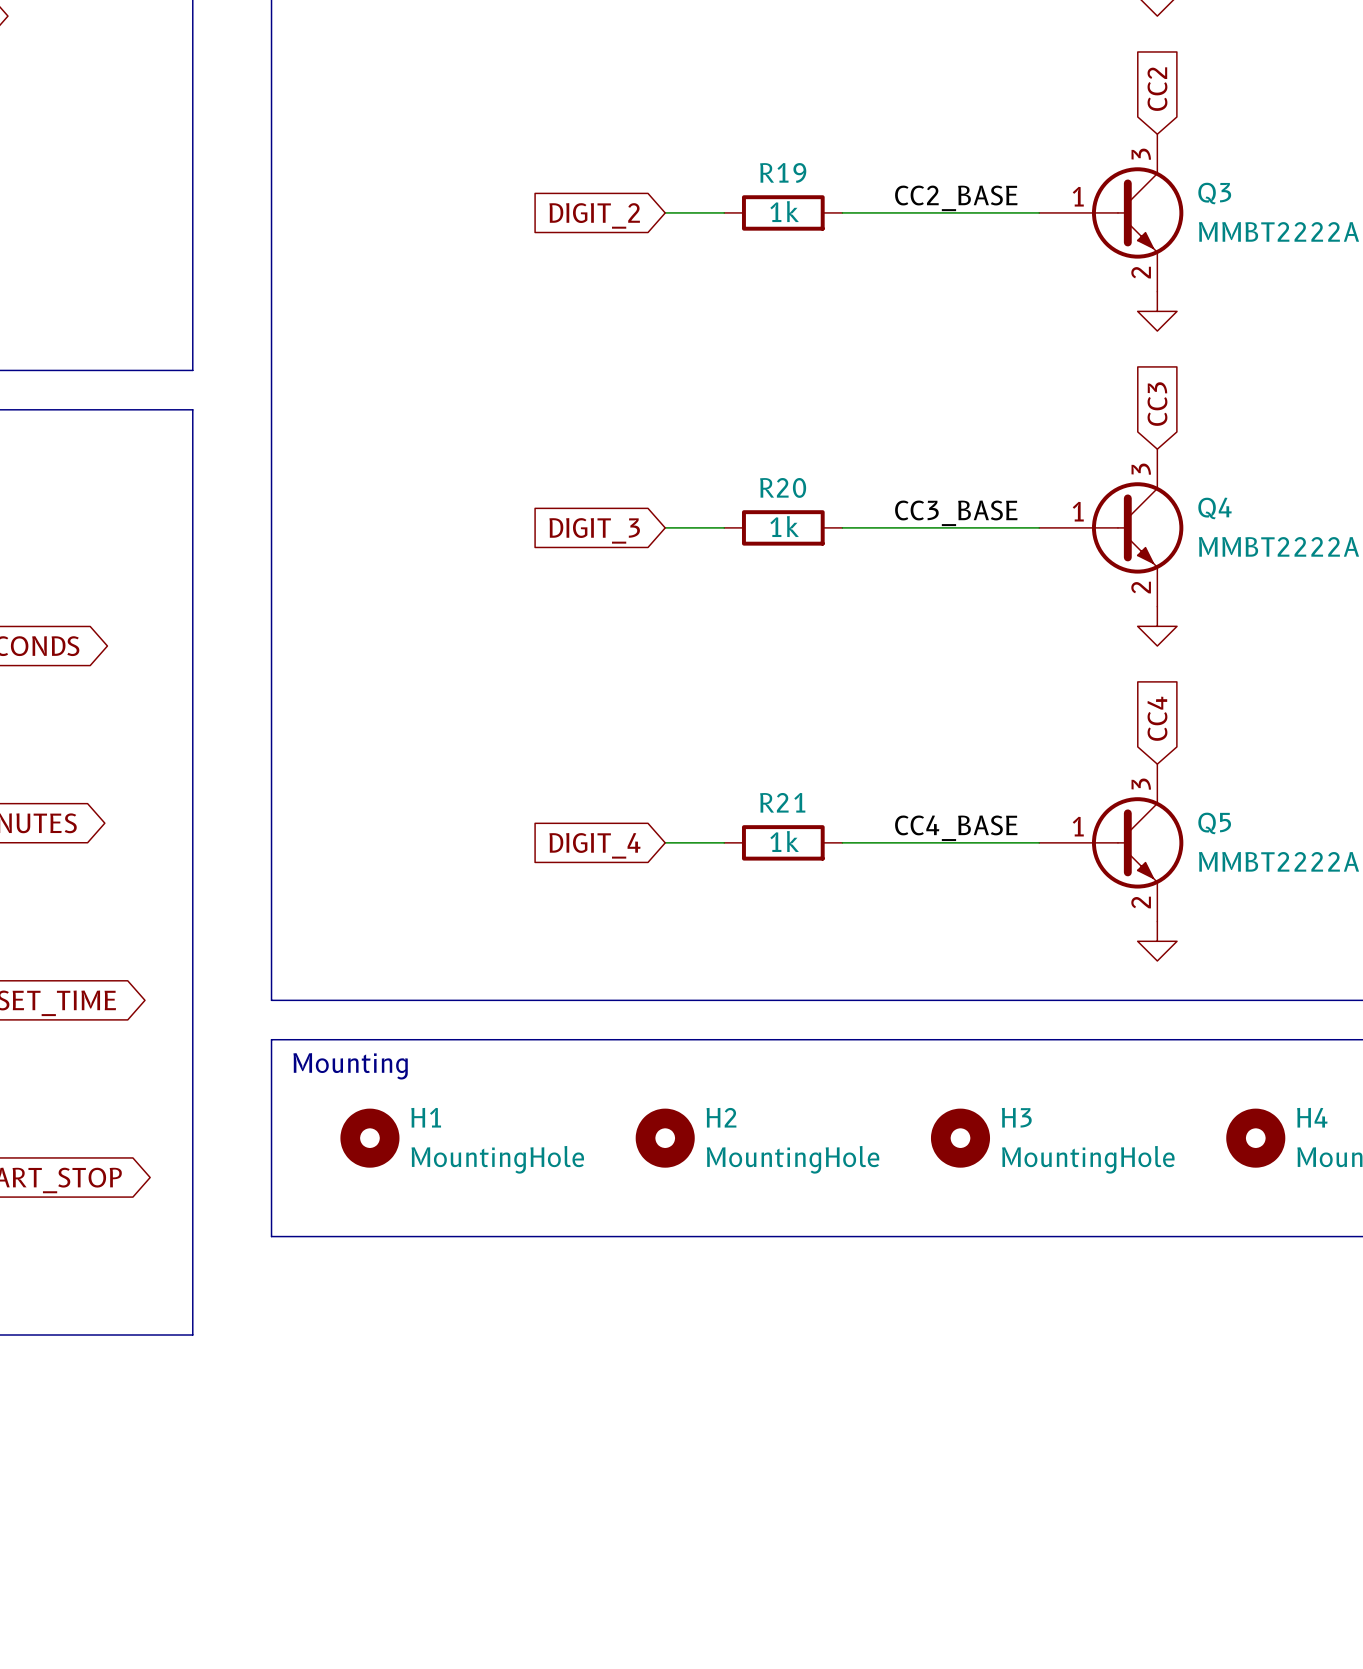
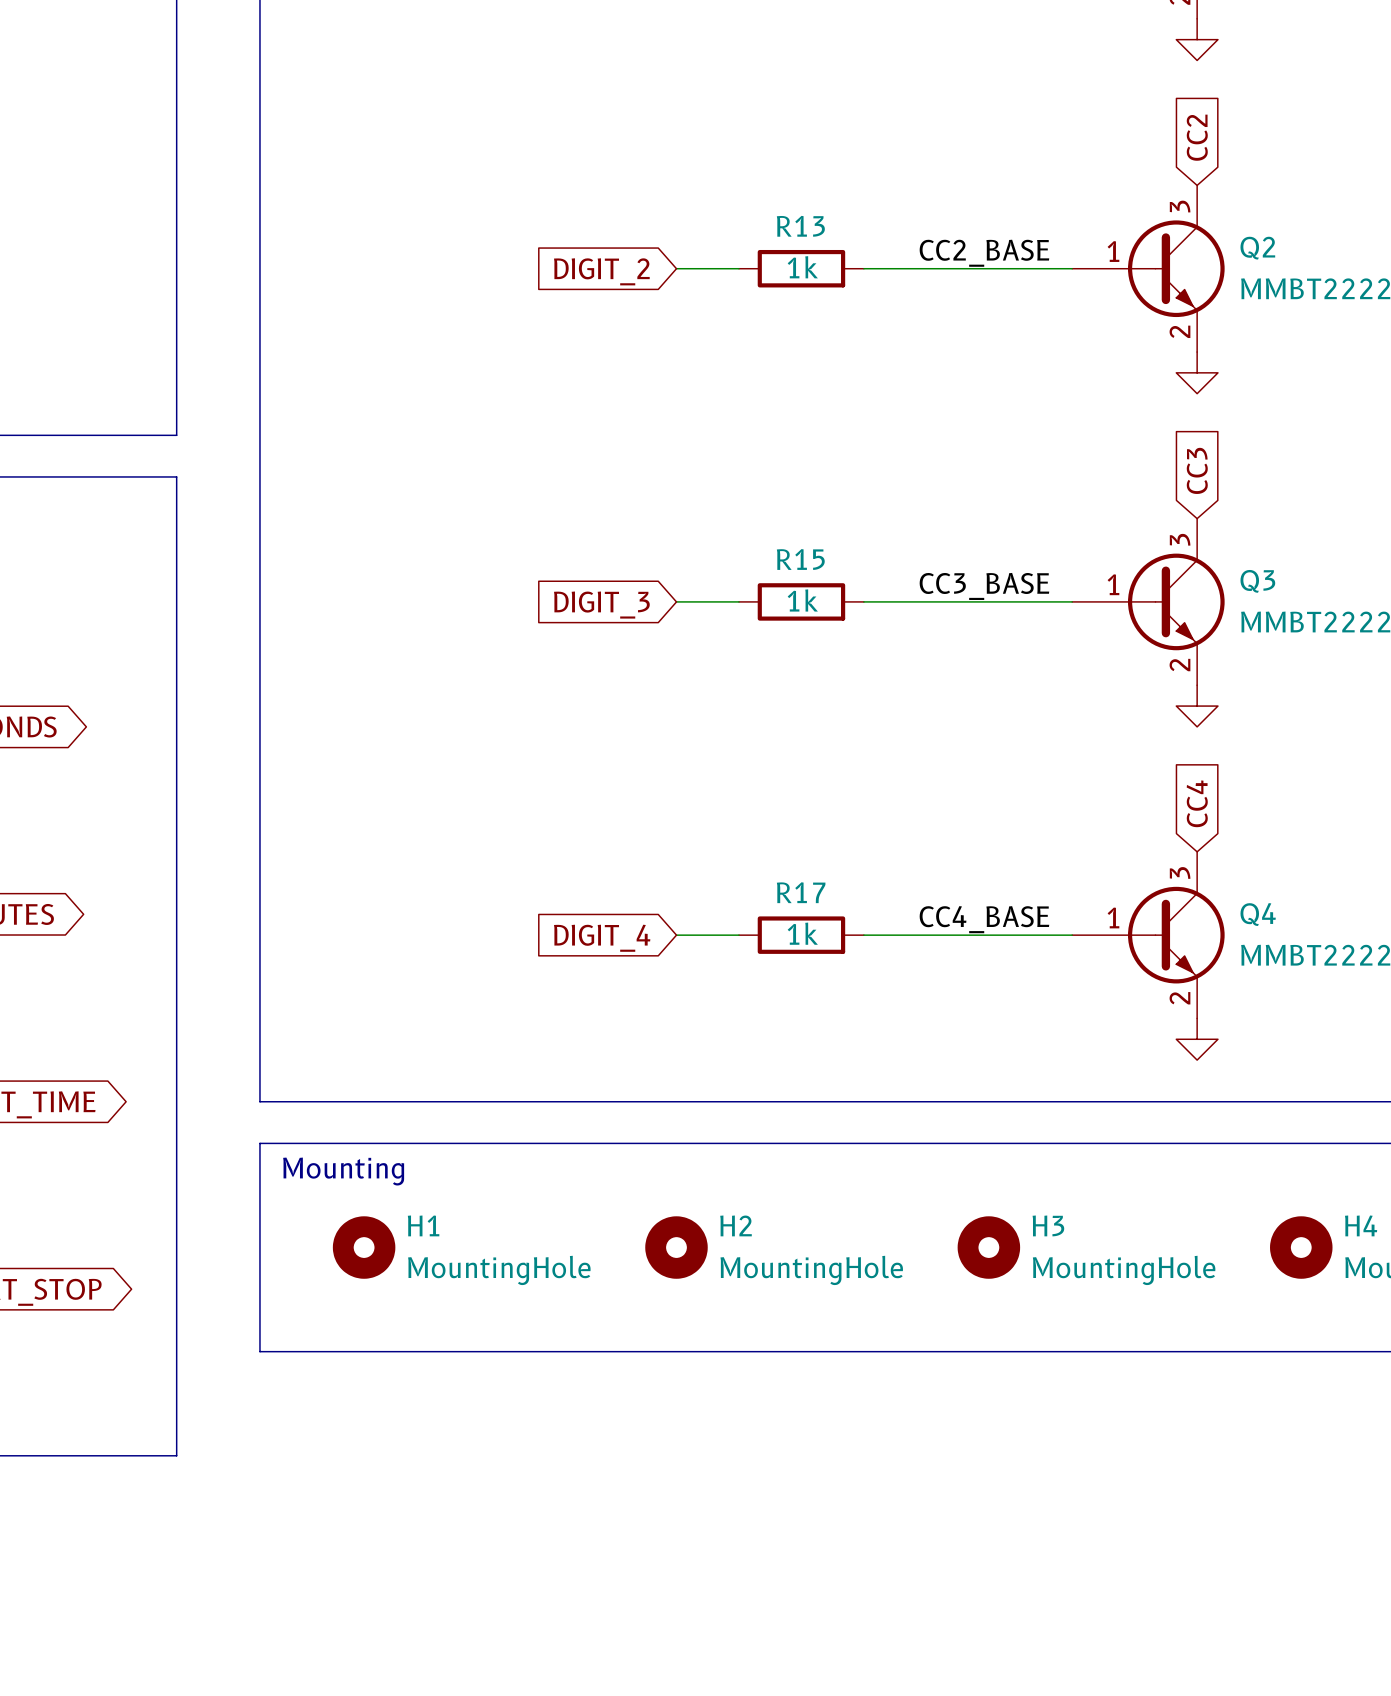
R19 name: R19 (783, 172) -> R13 (800, 226)
Q3 name: Q3 (1214, 193) -> Q2 (1257, 248)
R20 name: R20 (783, 487) -> R15 (800, 559)
Q4 name: Q4 (1215, 508) -> Q3 (1257, 581)
R21 name: R21 (782, 802) -> R17 (801, 892)
Q5 name: Q5 (1214, 823) -> Q4 (1258, 914)

